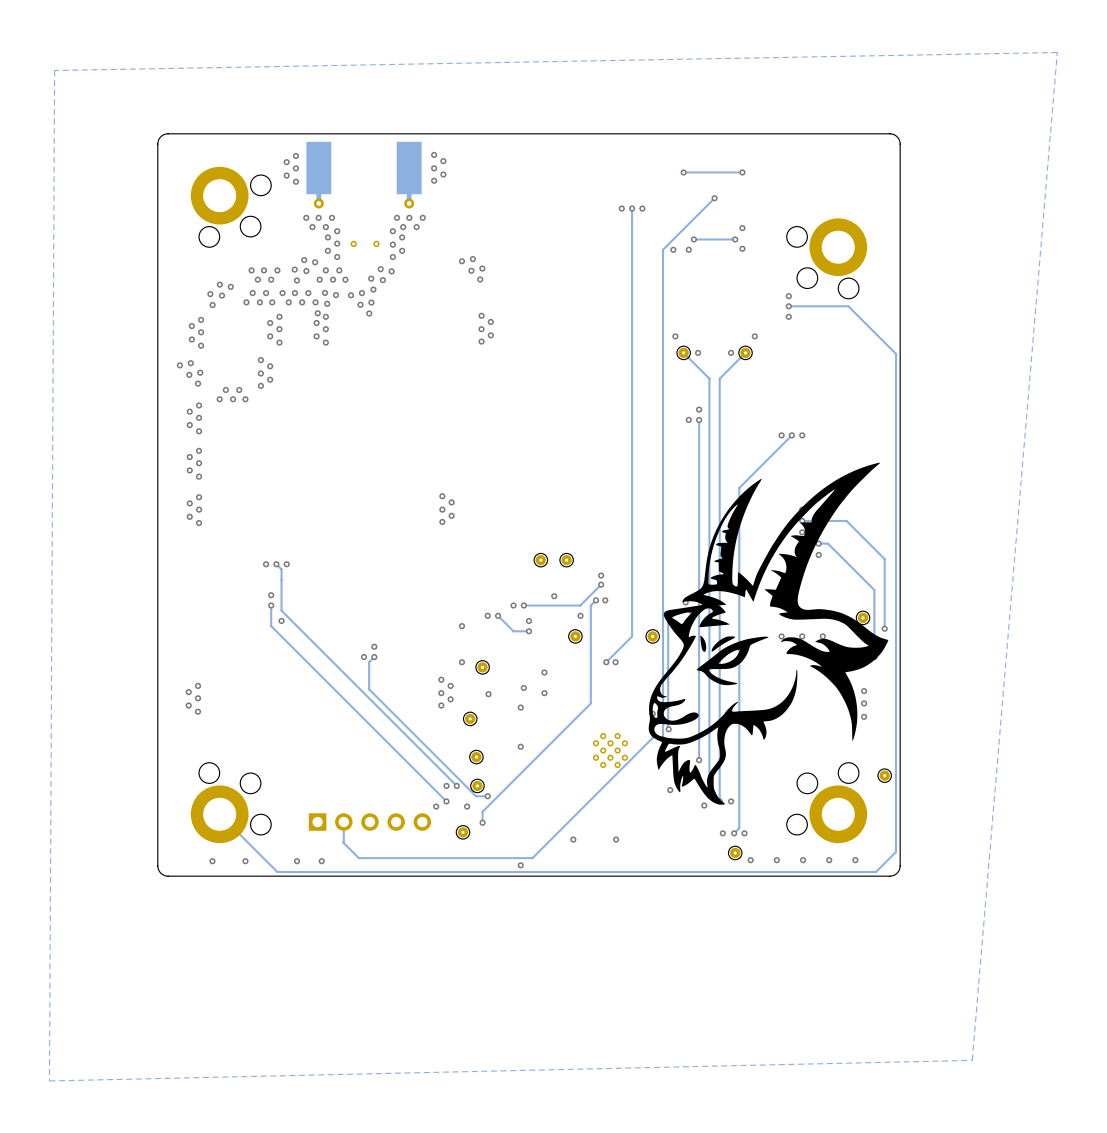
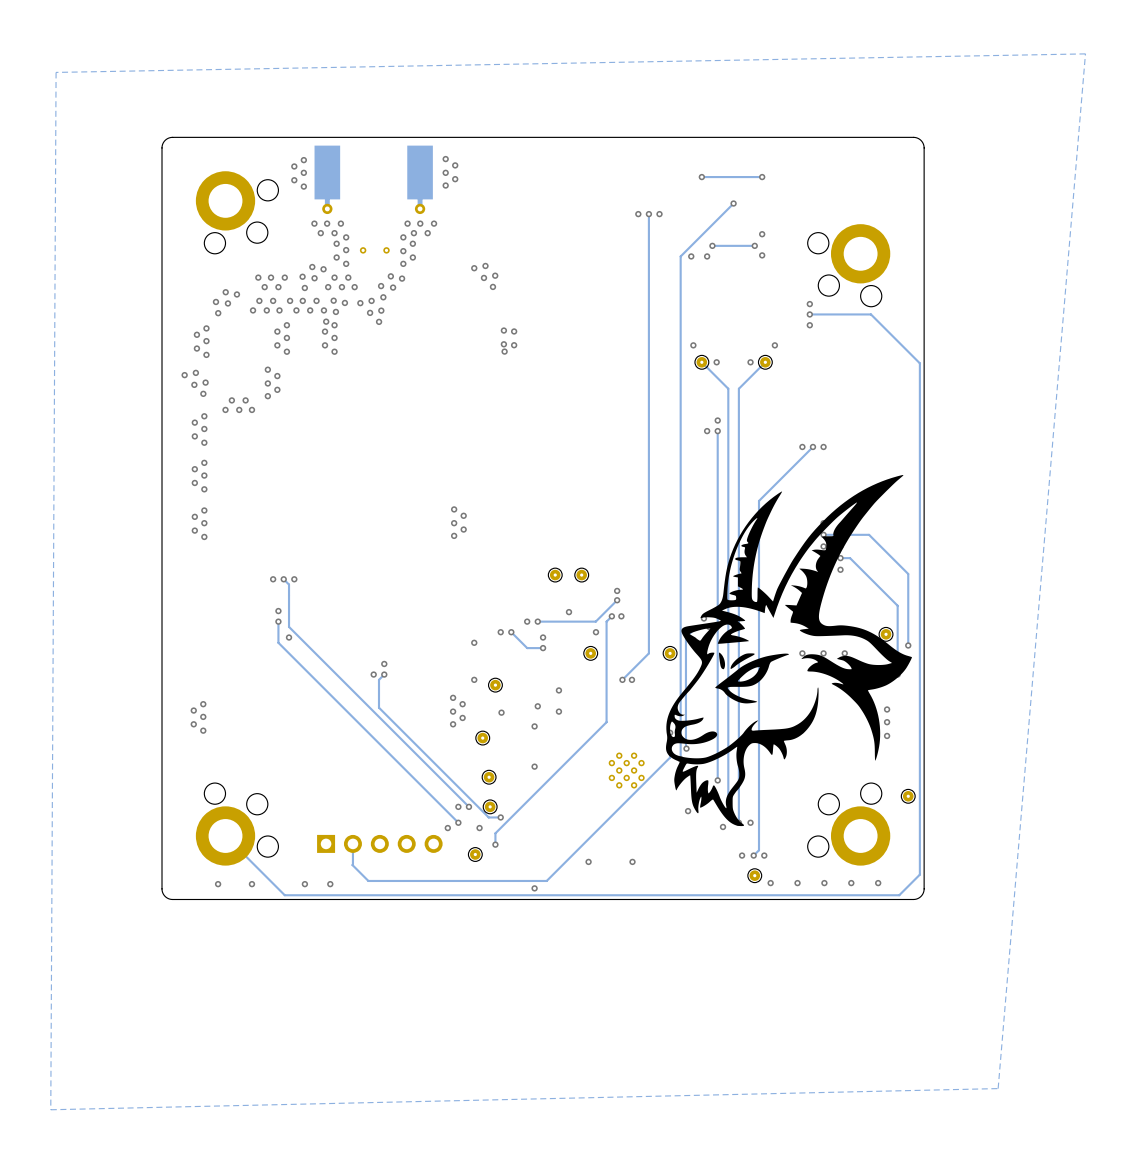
via: (481, 315) -> none
via: none -> (514, 331)
via: (481, 329) -> none
via: none -> (514, 345)
via: (481, 341) -> none
via: none -> (504, 351)

